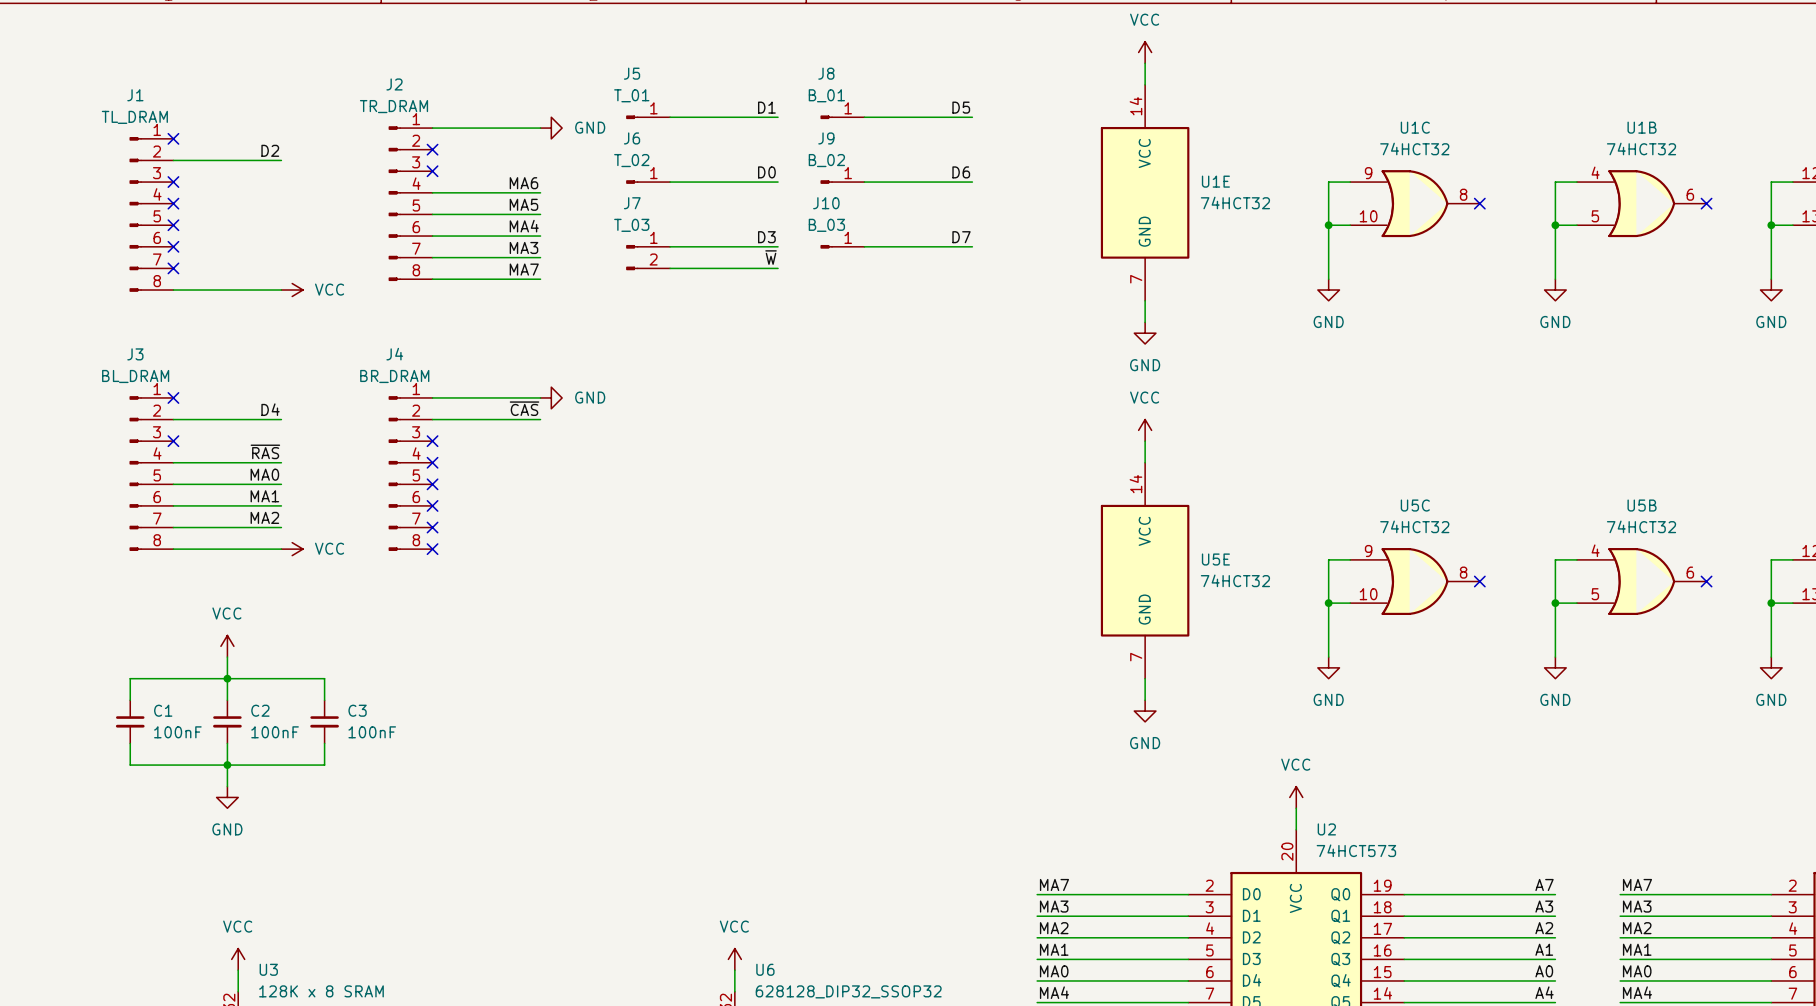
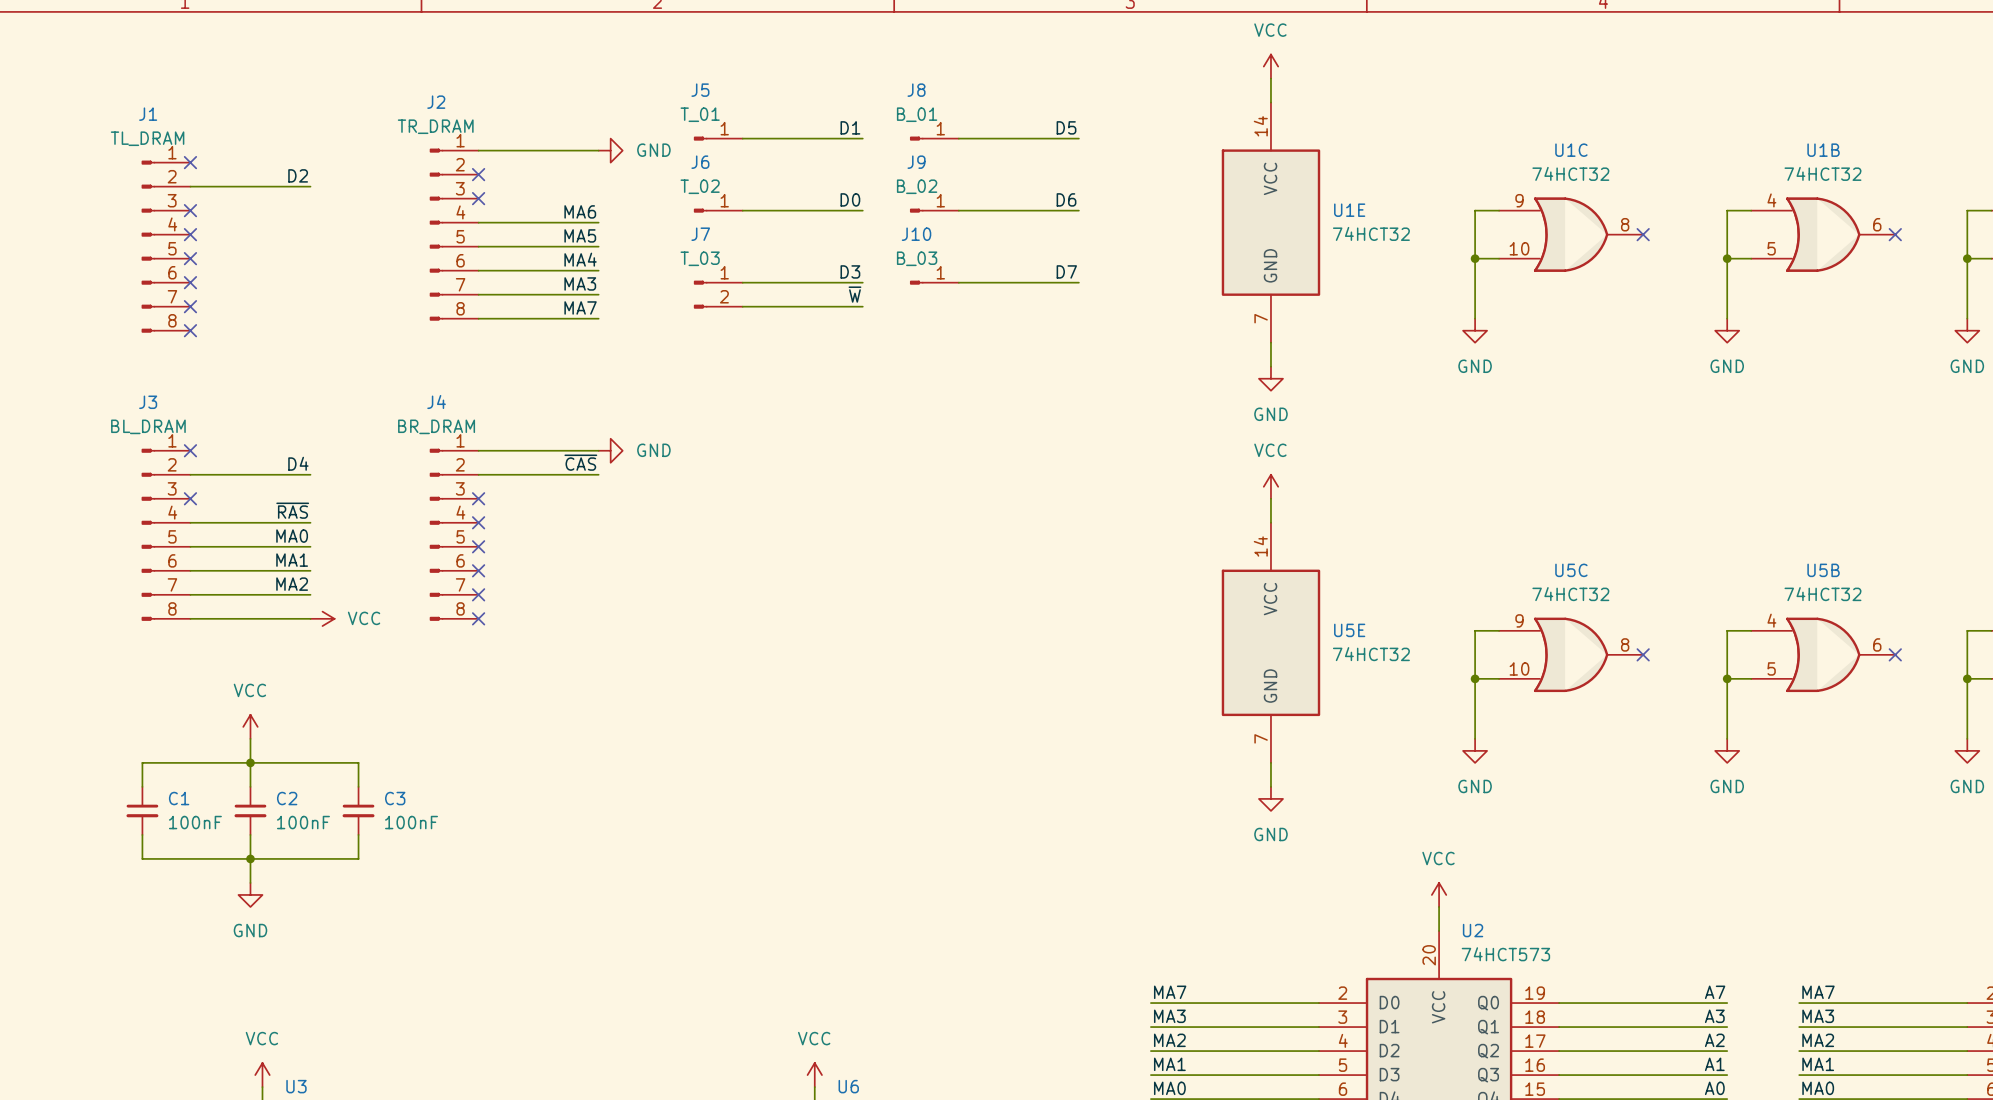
wire: (173, 290) (281, 290) -> none
no-connect mark: none -> (190, 330)
power symbol: VCC (292, 290) -> none

